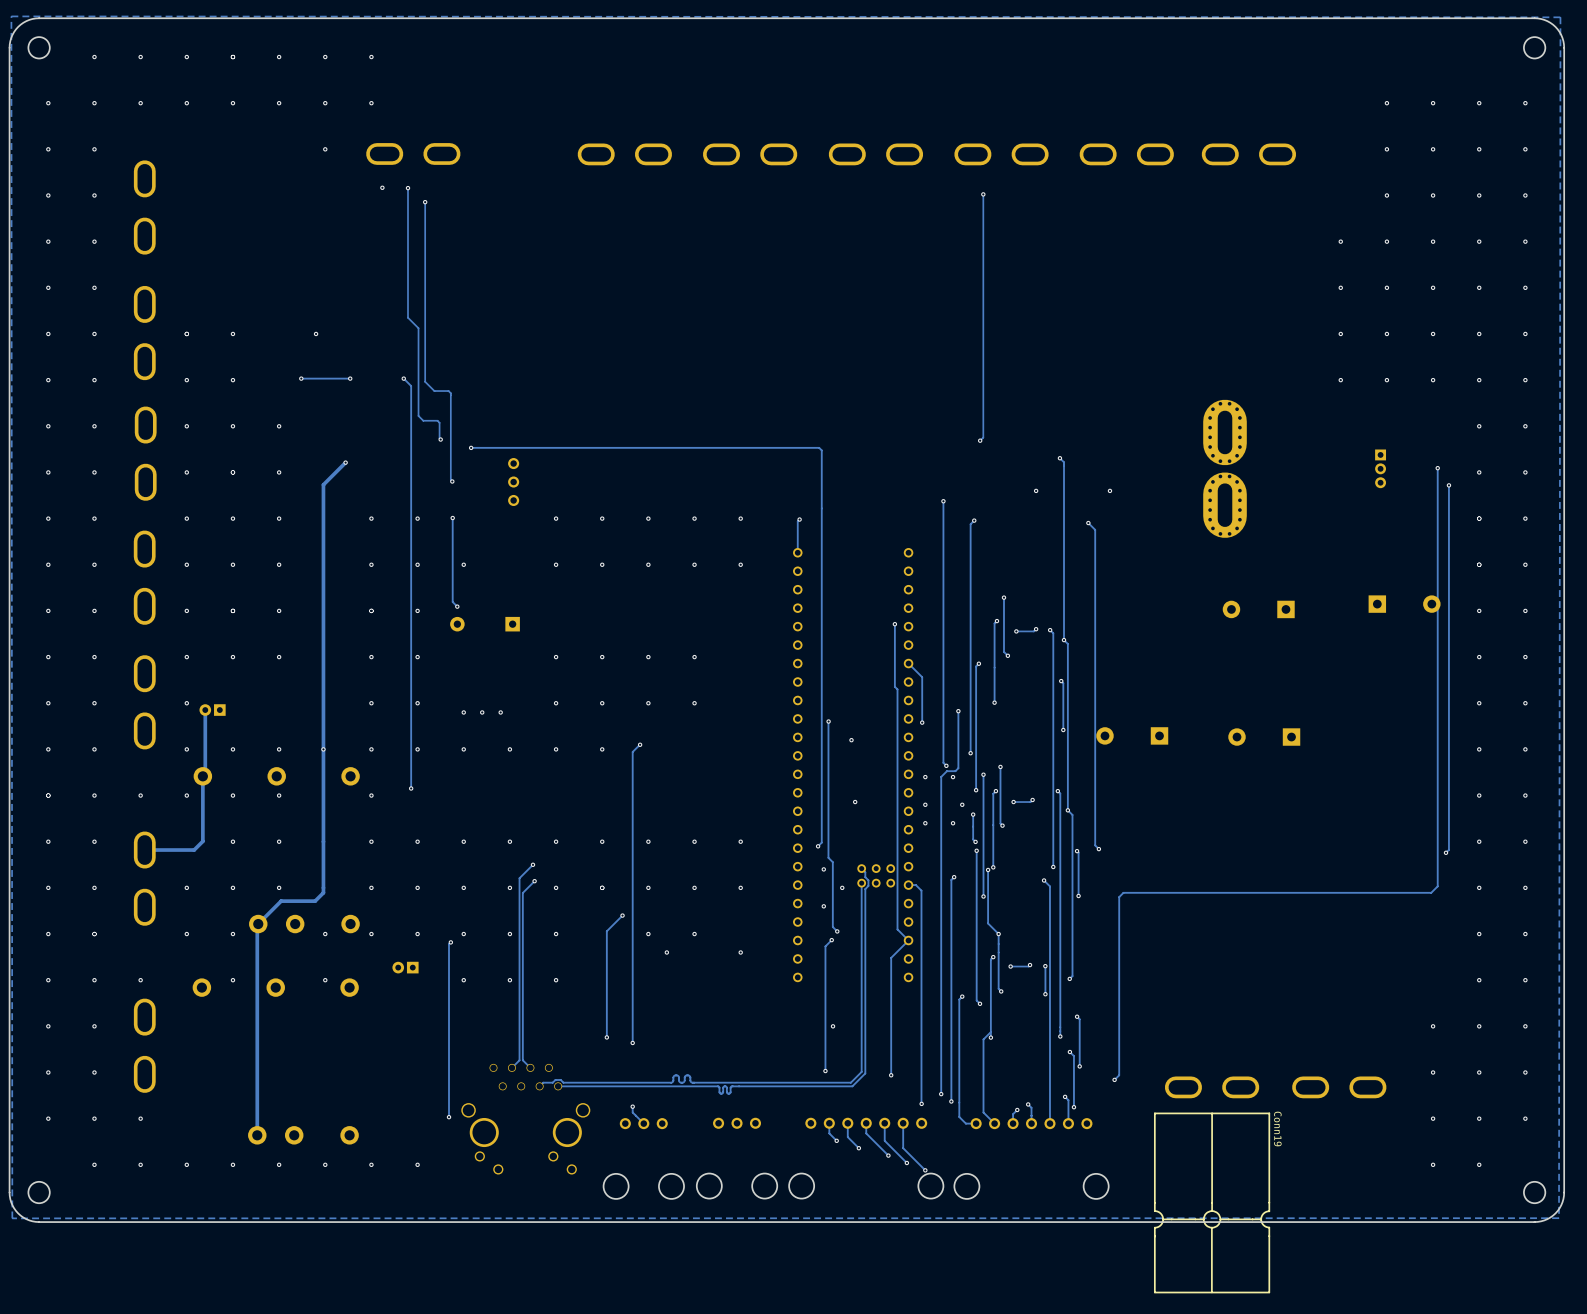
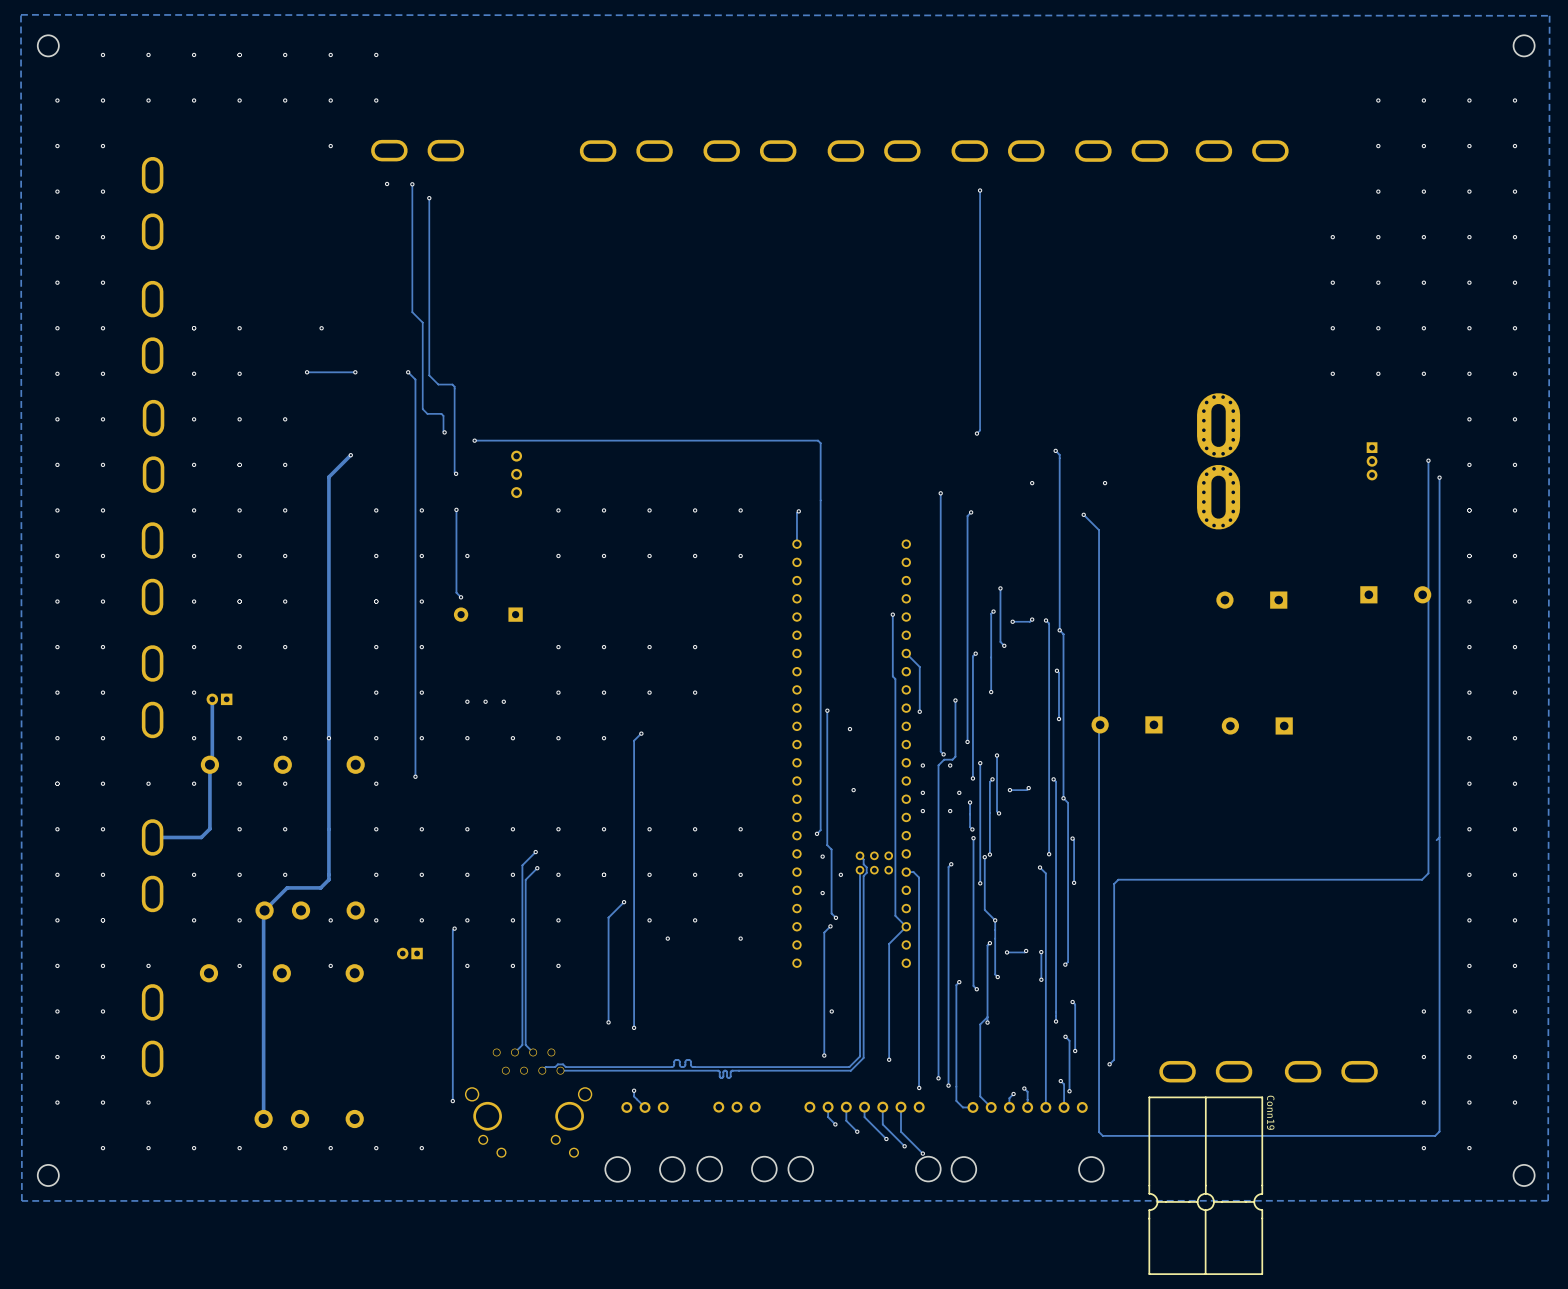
board edge: (1534, 18) (39, 18) (29, 19) (20, 24) (12, 34) (9, 47) (9, 1192) (11, 1202) (16, 1210) (26, 1219) (39, 1222) (1534, 1222) (1544, 1220) (1553, 1215) (1561, 1205) (1564, 1192) (1564, 47) (1562, 38) (1555, 26) (1547, 21) (1534, 18) -> none
track: (1095, 529) (1095, 845) (1098, 849) -> (1090, 521) (1099, 530) (1099, 1132) (1102, 1135) (1435, 1135) (1439, 1131) (1439, 837)
via: (1098, 849) -> none
via: (1446, 852) -> none

